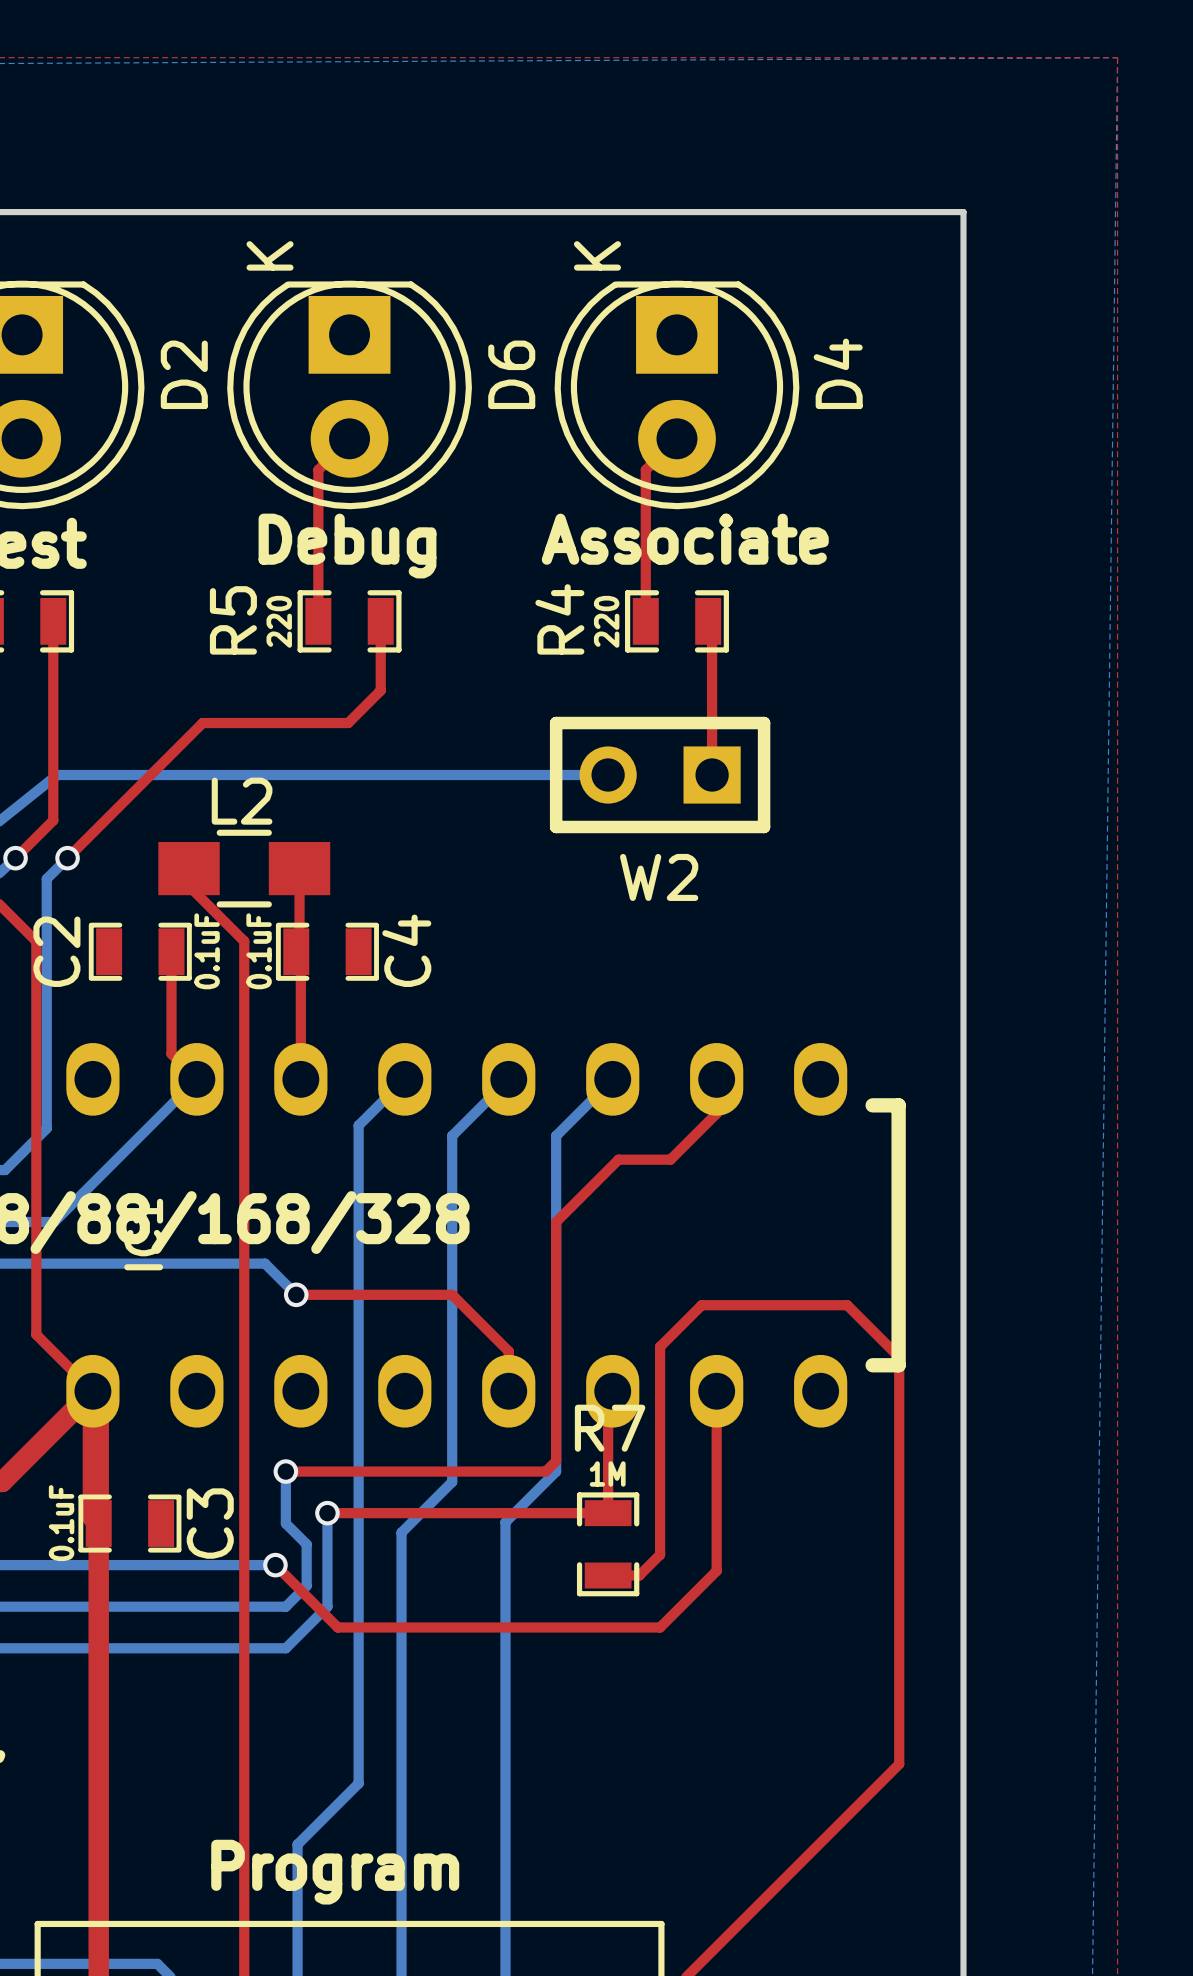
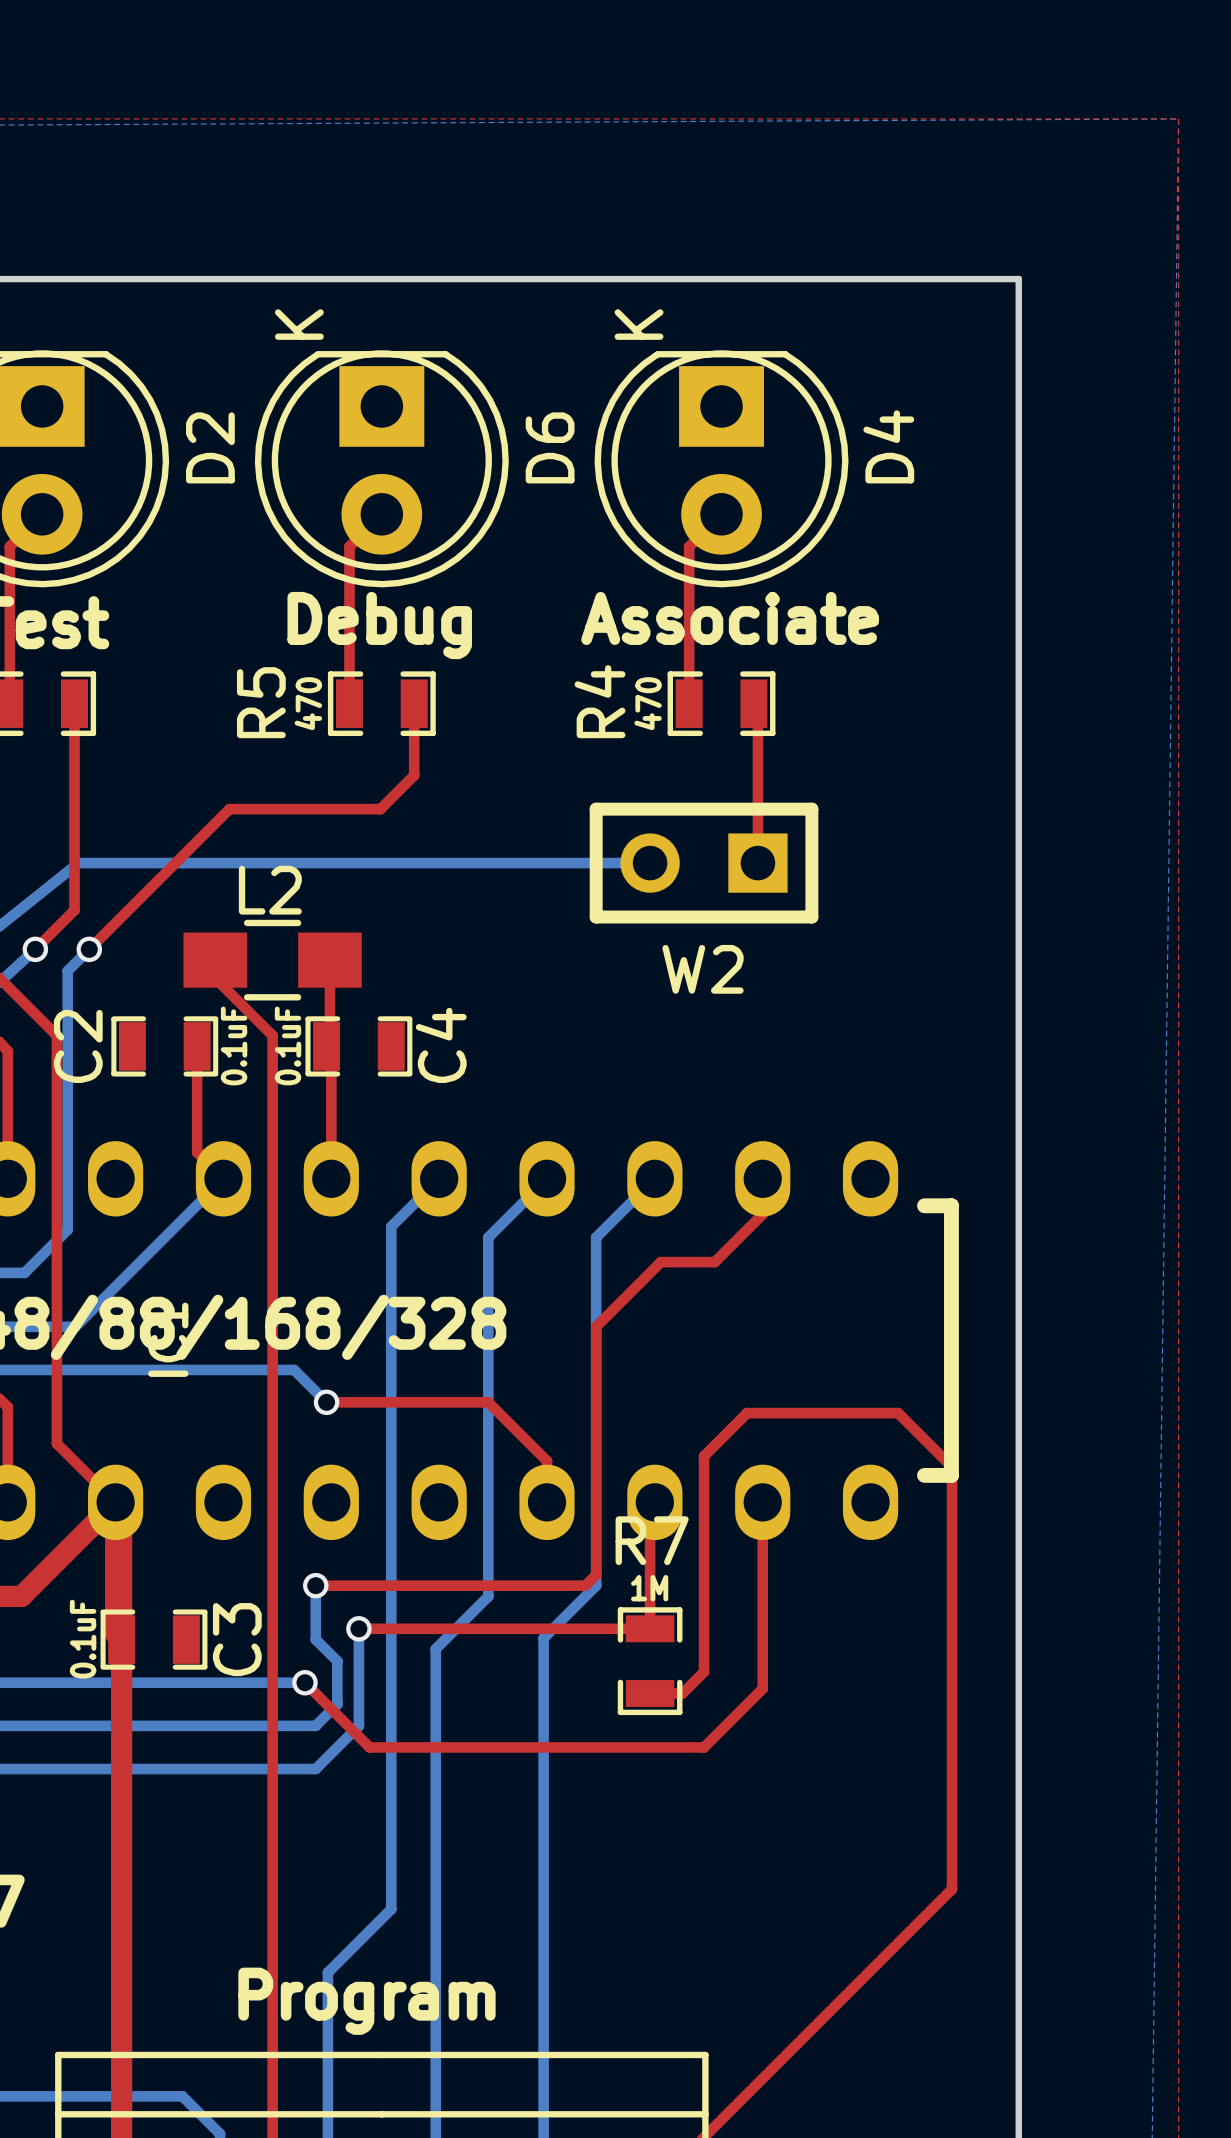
R5 value: 220 (279, 621) -> 470 (308, 703)
R4 value: 220 (606, 621) -> 470 (648, 703)

